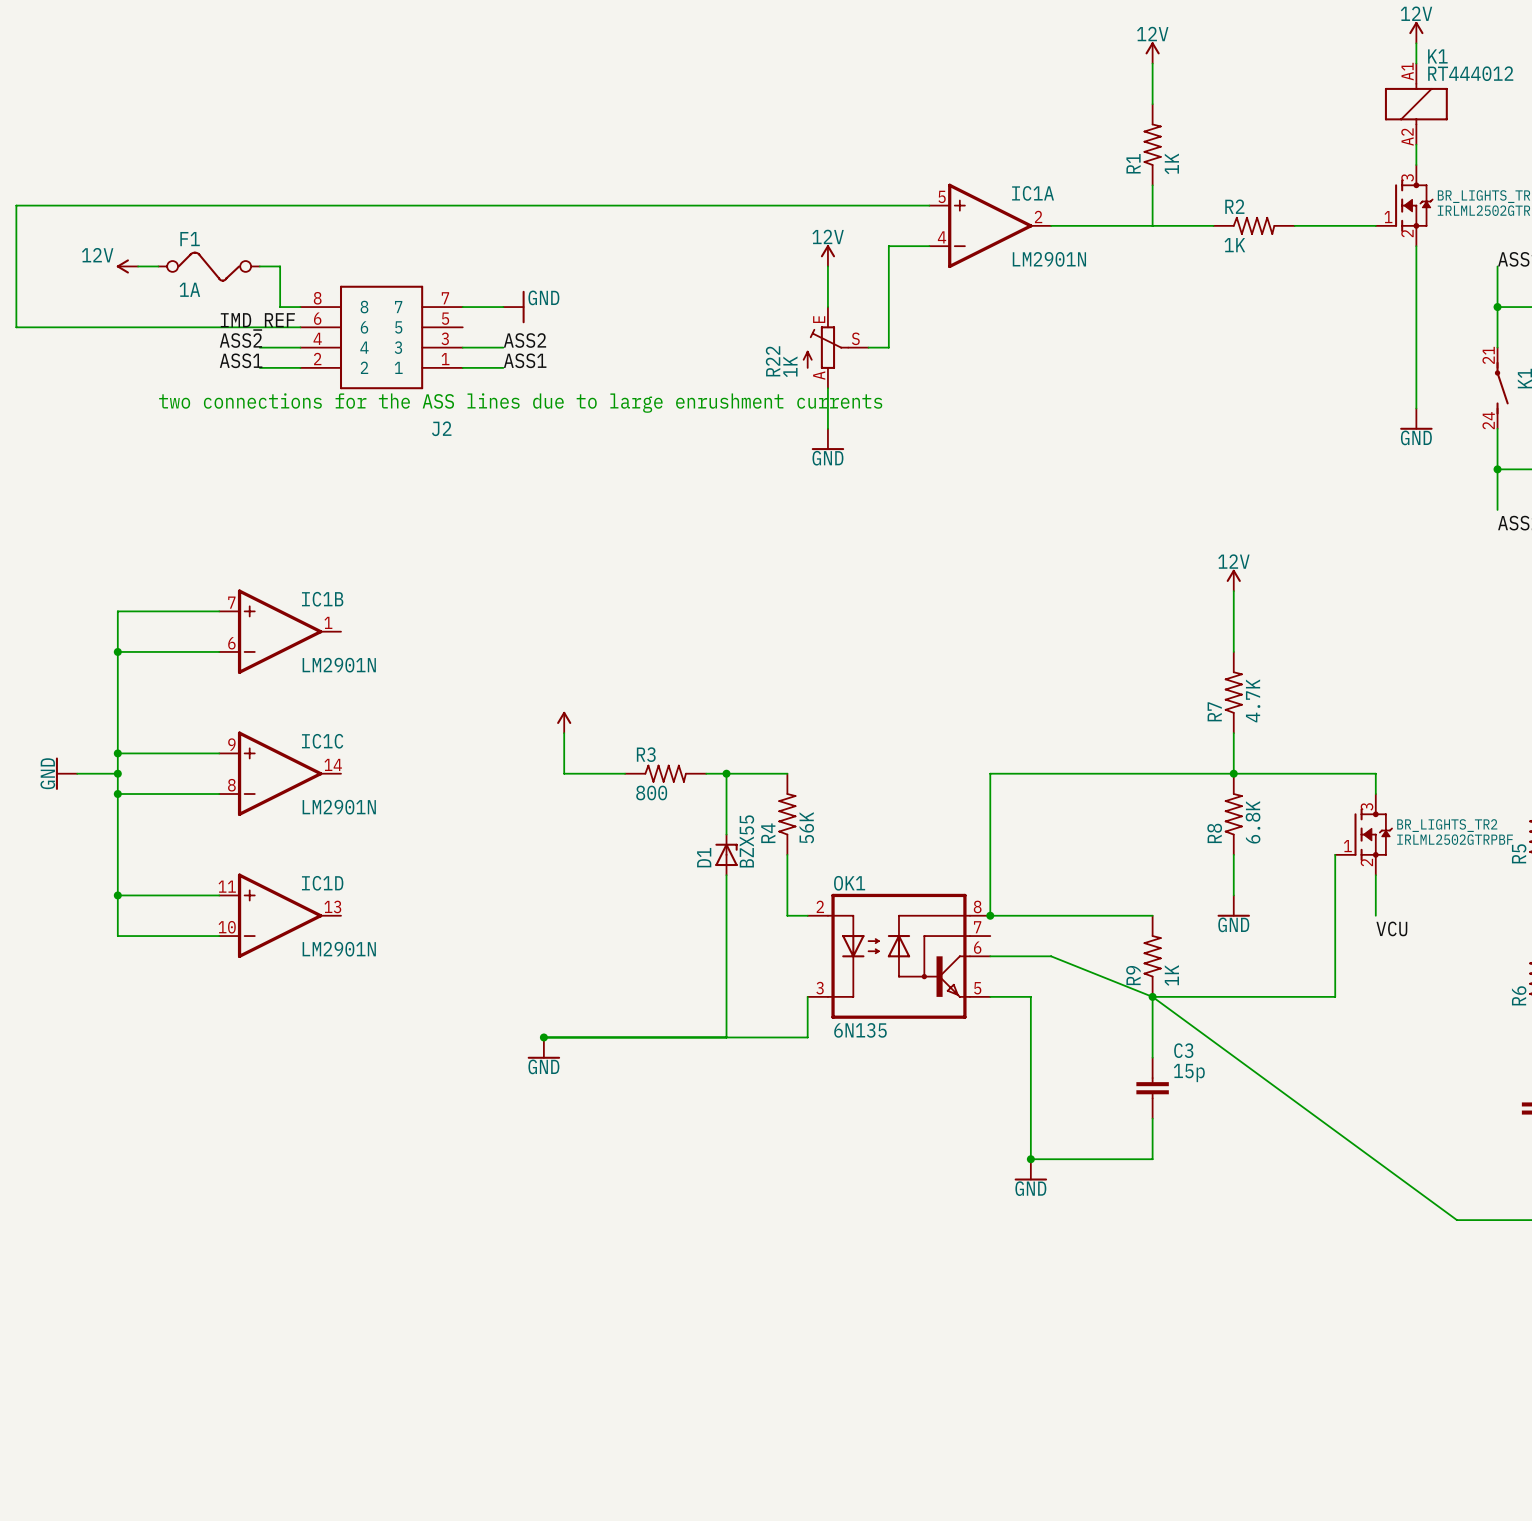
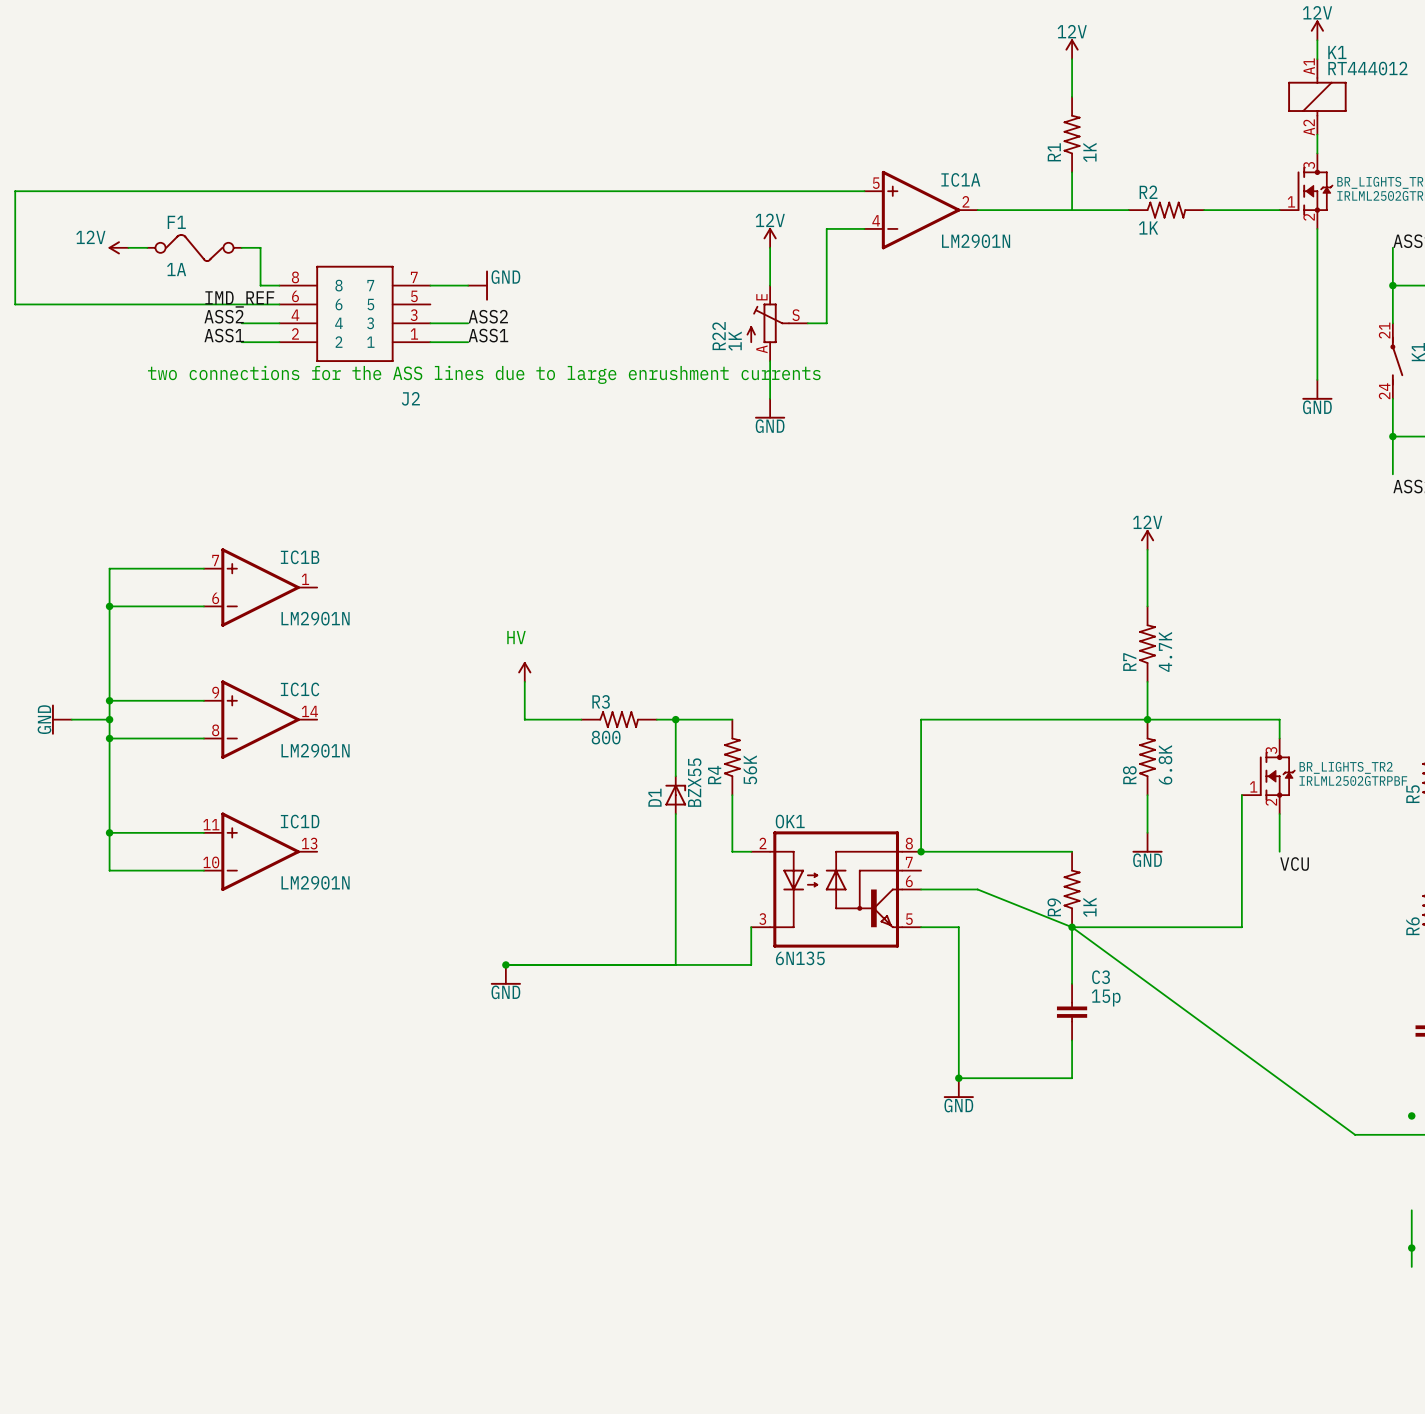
text: none -> HV (516, 637)
junction: none -> (1411, 1115)
wire: none -> (1411, 1210) (1411, 1266)
junction: none -> (1411, 1248)

